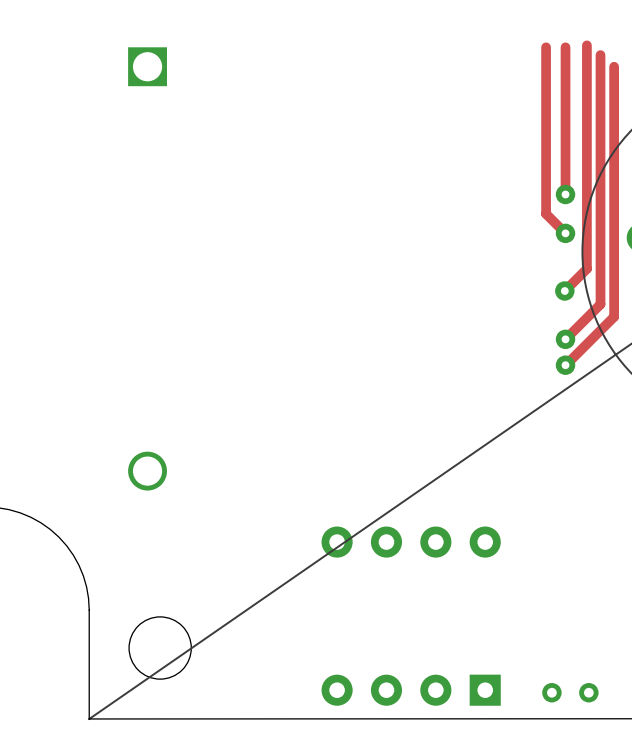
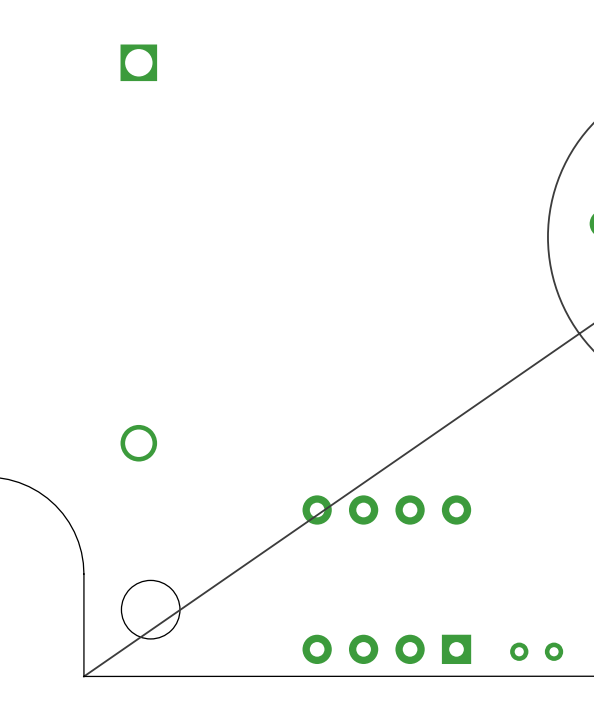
track: (586, 45) (586, 268) (564, 291) -> none
track: (546, 47) (546, 213) (565, 233) -> none
track: (565, 47) (565, 194) -> none
track: (600, 55) (600, 304) (565, 339) -> none
track: (614, 66) (614, 316) (565, 365) -> none
via: (565, 194) -> none
via: (565, 233) -> none
via: (564, 291) -> none
via: (565, 339) -> none
via: (565, 365) -> none

